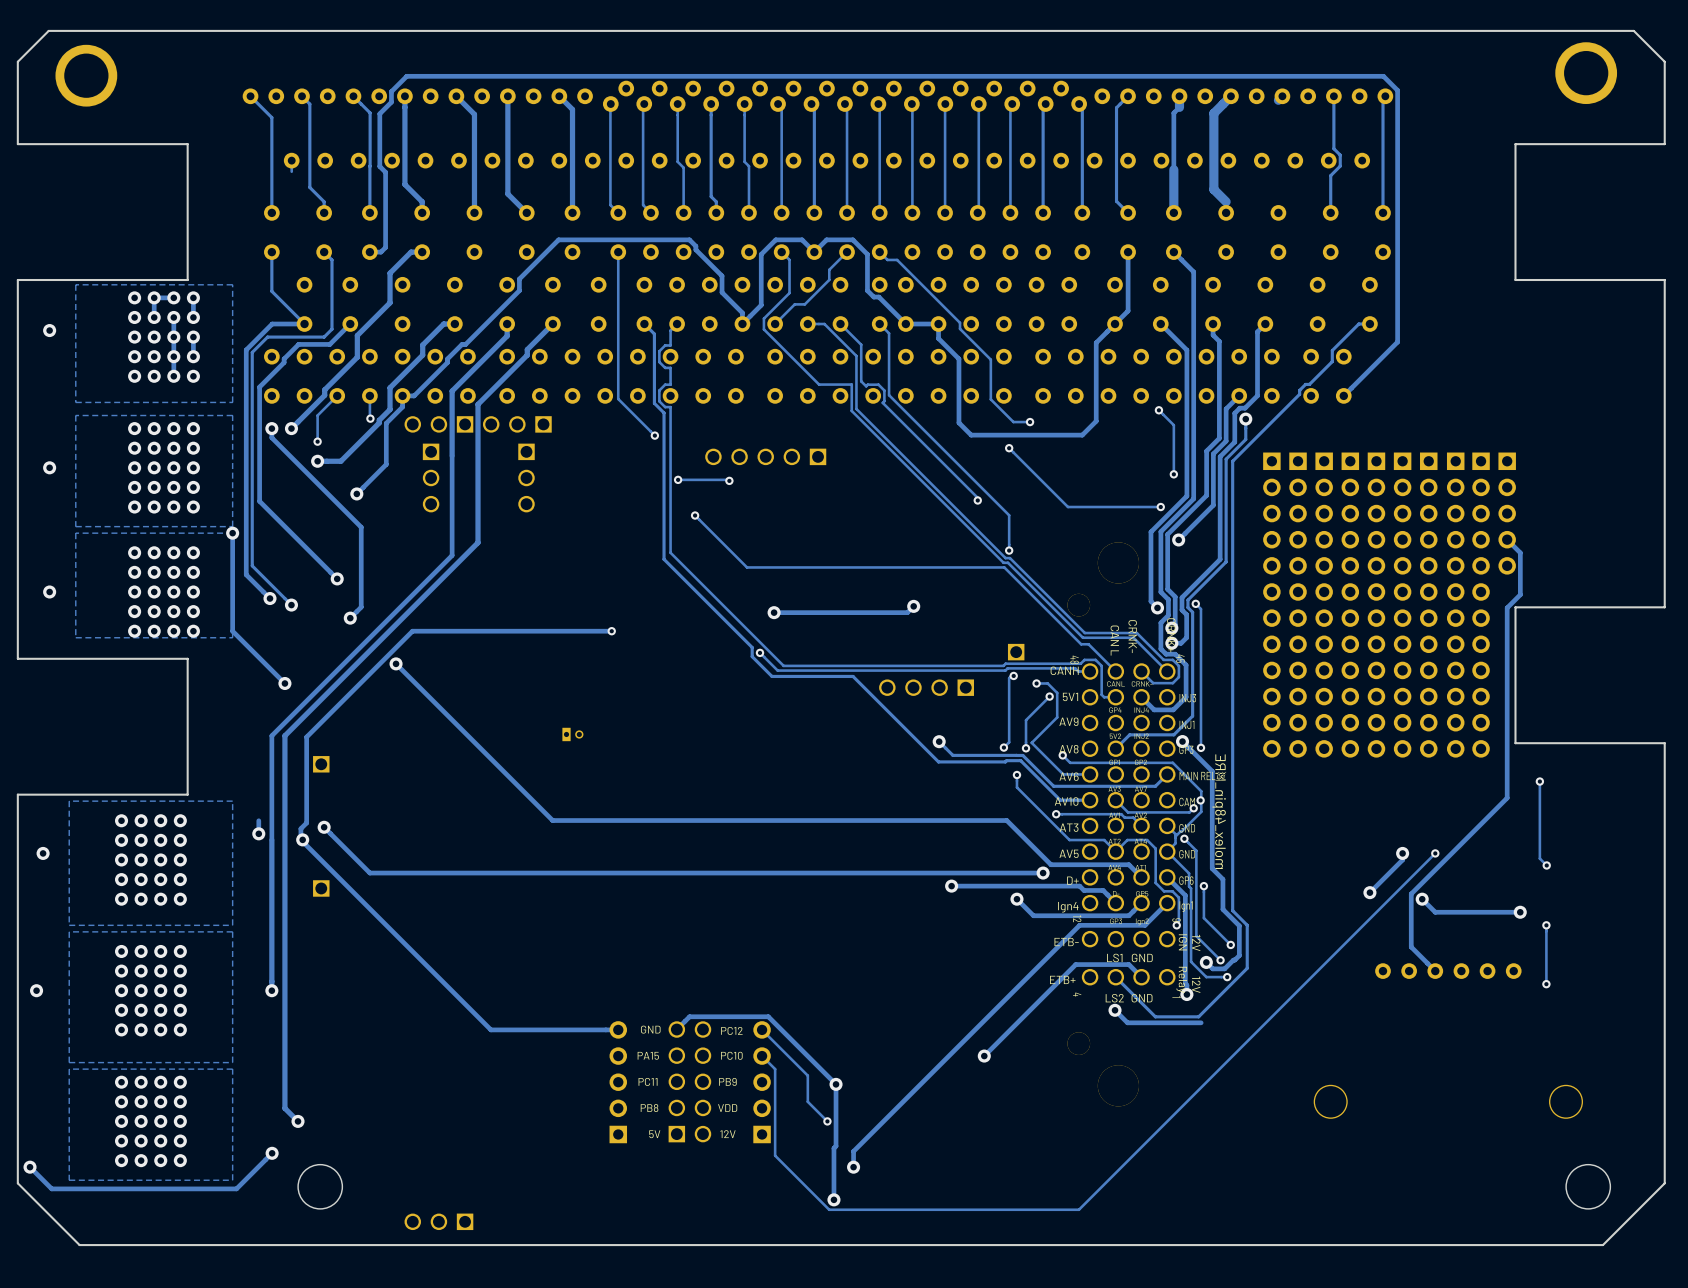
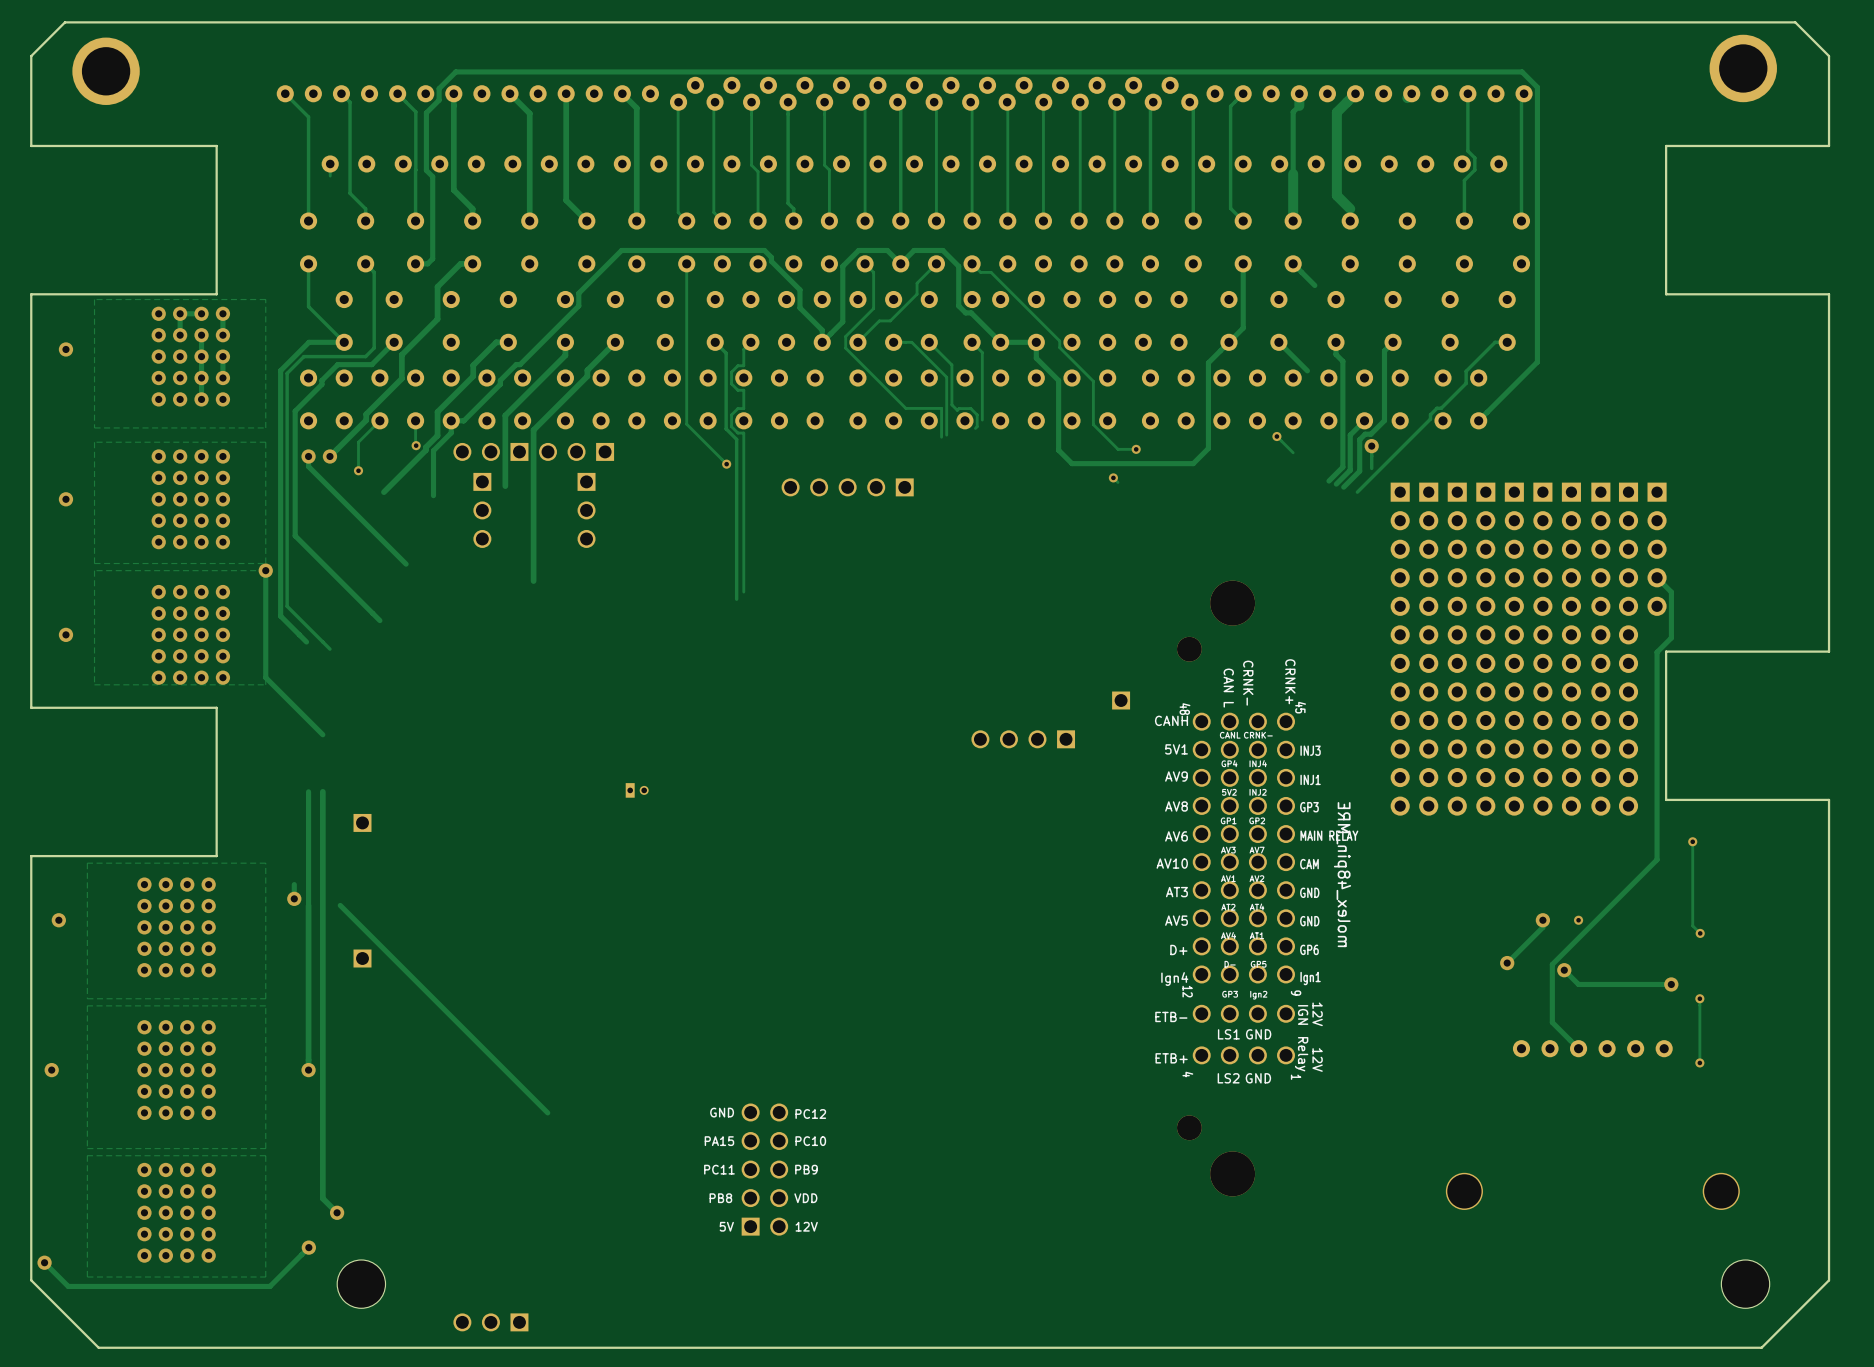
track: (1193, 271) (1193, 498) (1160, 531) (1160, 592) (1168, 599) (1168, 615) (1160, 622) (1160, 648) (1166, 654) (1175, 654) (1186, 665) (1186, 697) (1173, 709) (1154, 709) (1141, 697) -> none
track: (1186, 350) (1186, 496) (1150, 532) (1150, 601) (1157, 607) -> none
track: (889, 395) (1009, 515) (1009, 550) -> none
track: (882, 402) (977, 497) (977, 500) -> none
track: (856, 409) (1005, 558) (1009, 558) (1084, 633) (1136, 633) (1163, 659) (1172, 659) (1178, 665) (1178, 677) (1172, 683) (1153, 683) (1141, 671) -> none
track: (851, 410) (1003, 562) (1007, 562) (1082, 637) (1133, 637) (1167, 671) -> none
track: (1173, 425) (1173, 474) -> none
track: (1245, 439) (1226, 459) (1226, 561) (1187, 600) (1187, 607) (1192, 612) (1192, 716) (1173, 734) (1129, 734) (1115, 748) -> none
track: (1206, 451) (1206, 495) (1167, 534) (1167, 589) (1175, 596) (1175, 624) (1171, 628) -> none
track: (1013, 452) (1067, 507) (1160, 507) -> none
track: (1213, 453) (1213, 505) (1178, 539) -> none
track: (452, 455) (452, 555) (271, 735) -> none
track: (1220, 456) (1220, 559) (1181, 597) (1181, 610) (1186, 614) (1186, 637) (1181, 643) (1171, 643) -> none
via: (317, 461) -> none
track: (340, 461) (317, 461) -> none
track: (1232, 461) (1232, 910) (1247, 925) (1247, 968) (1198, 1016) (1155, 1016) (1115, 977) -> none
track: (386, 464) (356, 493) -> none
via: (1173, 474) -> none
track: (678, 479) (729, 480) -> none
via: (678, 479) -> none
via: (729, 480) -> none
via: (356, 493) -> none
via: (977, 500) -> none
via: (1160, 507) -> none
track: (695, 515) (747, 567) (1004, 567) (1081, 644) (1088, 644) (1115, 671) -> none
via: (695, 515) -> none
track: (361, 527) (361, 607) (350, 618) -> none
via: (1178, 539) -> none
track: (478, 542) (284, 735) -> none
via: (1009, 550) -> none
track: (670, 552) (783, 665) (1003, 665) (1005, 663) (1080, 663) (1084, 659) (1095, 659) (1101, 665) (1101, 694) (1104, 697) (1115, 697) -> none
track: (664, 559) (752, 647) (752, 656) (772, 676) (853, 676) (938, 761) (1020, 760) (1060, 800) (1090, 800) -> none
via: (337, 578) -> none
via: (269, 598) -> none
track: (1195, 603) (1200, 609) (1200, 747) -> none
via: (1195, 603) -> none
via: (291, 605) -> none
track: (913, 606) (907, 612) (774, 612) -> none
via: (913, 606) -> none
via: (1157, 607) -> none
via: (774, 612) -> none
via: (350, 618) -> none
via: (1171, 628) -> none
track: (611, 631) (412, 631) (306, 737) (306, 822) (300, 828) (300, 839) (302, 839) -> none
via: (611, 631) -> none
via: (1171, 643) -> none
track: (760, 652) (777, 670) (1005, 670) (1007, 668) (1075, 668) (1078, 671) (1090, 671) -> none
via: (760, 652) -> none
track: (396, 663) (552, 820) (1006, 820) (1051, 864) (1128, 864) (1141, 877) -> none
via: (396, 663) -> none
track: (1013, 675) (1009, 678) (1009, 742) (1003, 747) -> none
via: (1013, 675) -> none
via: (284, 683) -> none
track: (1036, 683) (1047, 683) (1057, 692) (1057, 717) (1031, 742) (1063, 774) (1090, 774) -> none
via: (1036, 683) -> none
track: (1049, 696) (1026, 720) (1026, 748) -> none
via: (1049, 696) -> none
track: (939, 741) (952, 755) (1016, 755) -> none
via: (939, 741) -> none
track: (1182, 741) (1212, 771) (1212, 868) (1222, 879) (1222, 909) (1239, 925) (1239, 955) (1224, 968) (1212, 968) (1206, 962) -> none
via: (1182, 741) -> none
via: (1003, 747) -> none
via: (1200, 747) -> none
via: (1026, 748) -> none
track: (1016, 755) (1022, 755) (1053, 786) (1155, 786) (1167, 774) -> none
track: (1062, 755) (1070, 762) (1172, 762) (1201, 791) (1201, 811) (1175, 836) -> none
via: (1062, 755) -> none
track: (1016, 775) (1016, 787) (1069, 840) (1104, 840) (1115, 851) (1127, 840) (1147, 840) (1155, 848) (1155, 882) (1164, 891) (1172, 891) (1178, 897) (1178, 921) (1175, 925) (1176, 925) -> none
via: (1016, 775) -> none
track: (1115, 800) (1128, 812) (1189, 812) (1193, 808) -> none
via: (1200, 800) -> none
via: (1193, 808) -> none
track: (1056, 814) (1121, 814) (1124, 817) (1133, 817) (1141, 825) -> none
via: (1056, 814) -> none
track: (1167, 825) (1175, 834) (1175, 843) (1167, 851) (1189, 873) (1189, 886) (1191, 888) (1191, 961) (1206, 977) (1227, 977) -> none
track: (324, 827) (369, 873) (1043, 873) -> none
via: (324, 827) -> none
track: (1184, 838) (1196, 850) (1196, 936) (1220, 960) -> none
via: (1184, 838) -> none
via: (302, 839) -> none
track: (1435, 853) (1078, 1209) (829, 1209) (775, 1155) (775, 1069) (762, 1056) -> none
via: (1043, 873) -> none
track: (1167, 877) (1185, 895) (1186, 994) -> none
track: (951, 886) (1079, 886) (1084, 890) (1103, 890) (1115, 903) -> none
via: (951, 886) -> none
track: (1203, 886) (1203, 918) (1230, 944) -> none
via: (1203, 886) -> none
track: (1016, 899) (1033, 915) (1128, 915) (1141, 903) -> none
via: (1016, 899) -> none
track: (1167, 903) (1145, 925) (1079, 925) (853, 1151) (853, 1167) -> none
via: (1176, 925) -> none
via: (1230, 944) -> none
via: (1220, 960) -> none
via: (1206, 962) -> none
track: (1141, 977) (1128, 964) (1075, 964) (984, 1056) -> none
via: (1227, 977) -> none
via: (1186, 994) -> none
track: (1115, 1010) (1127, 1022) (1201, 1022) -> none
via: (1115, 1010) -> none
track: (618, 1029) (490, 1029) -> none
track: (676, 1029) (689, 1016) (768, 1016) (836, 1084) (833, 1199) -> none
track: (762, 1029) (807, 1075) (807, 1101) (827, 1121) -> none
via: (984, 1056) -> none
part: (618, 1082) -> none
part: (762, 1082) -> none
via: (836, 1084) -> none
via: (827, 1121) -> none
via: (853, 1167) -> none
via: (833, 1199) -> none

